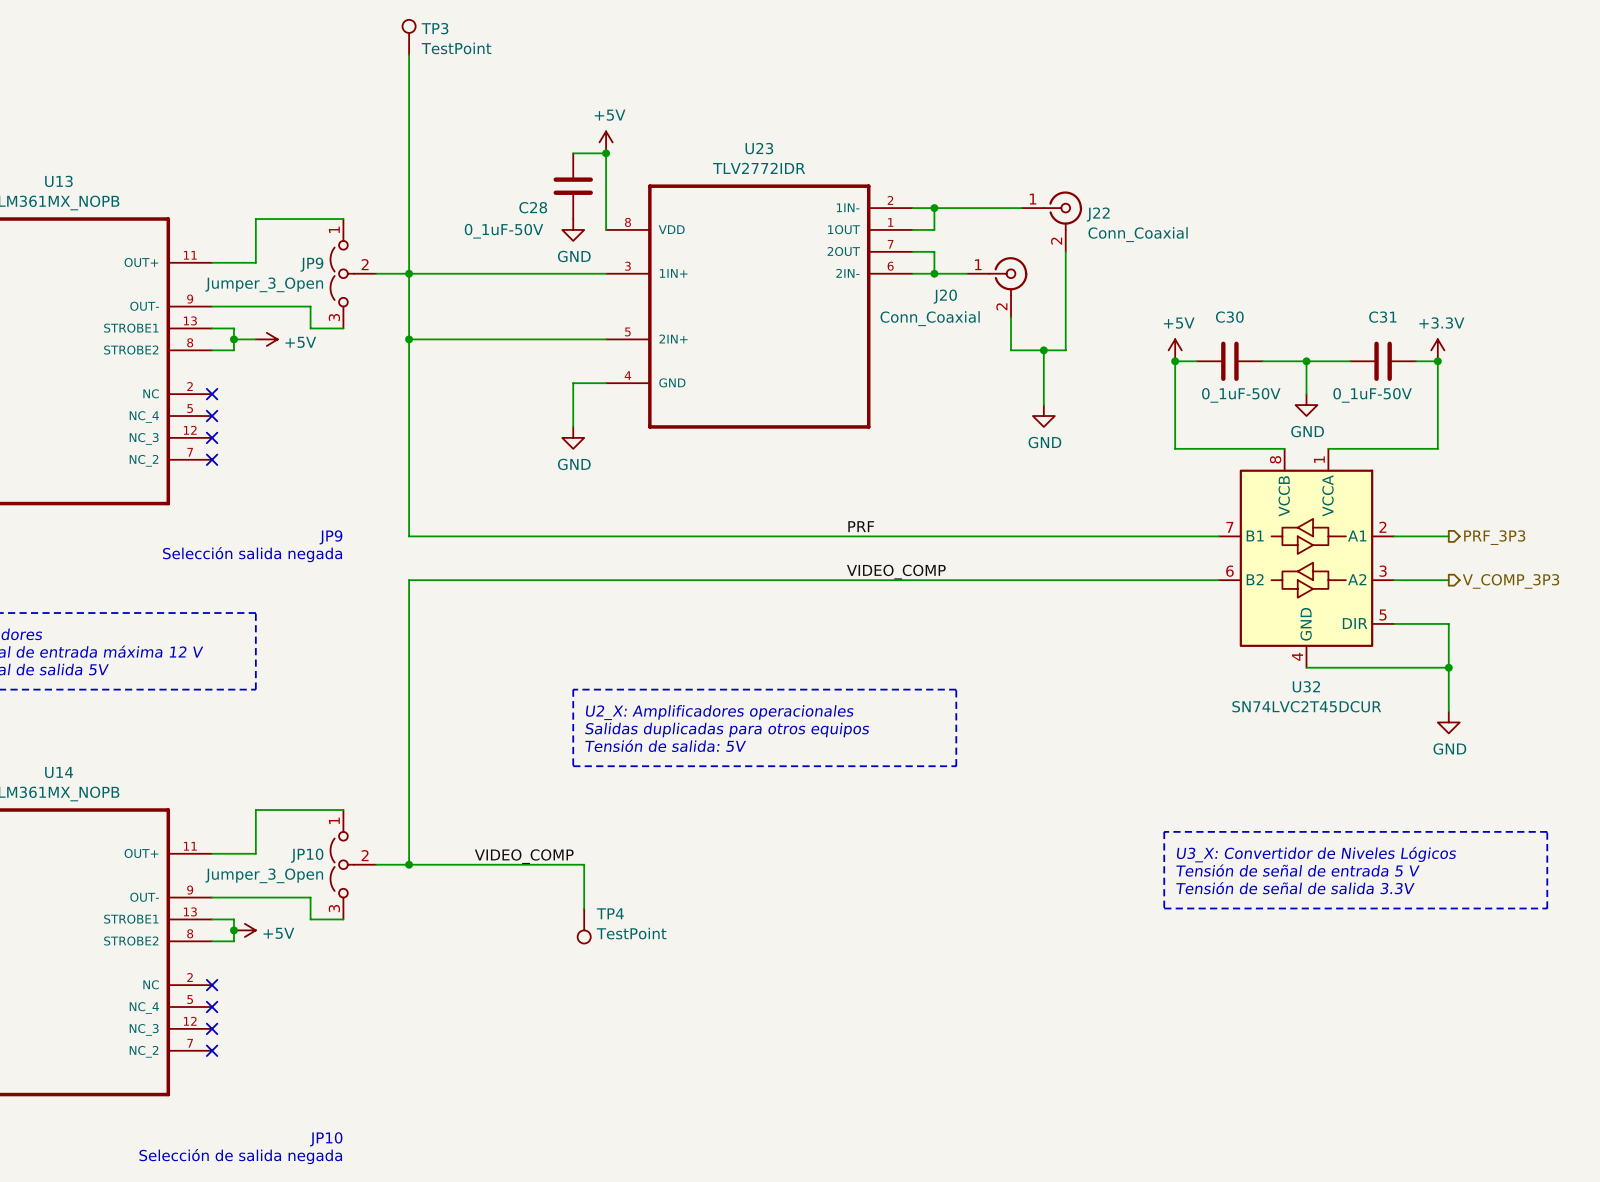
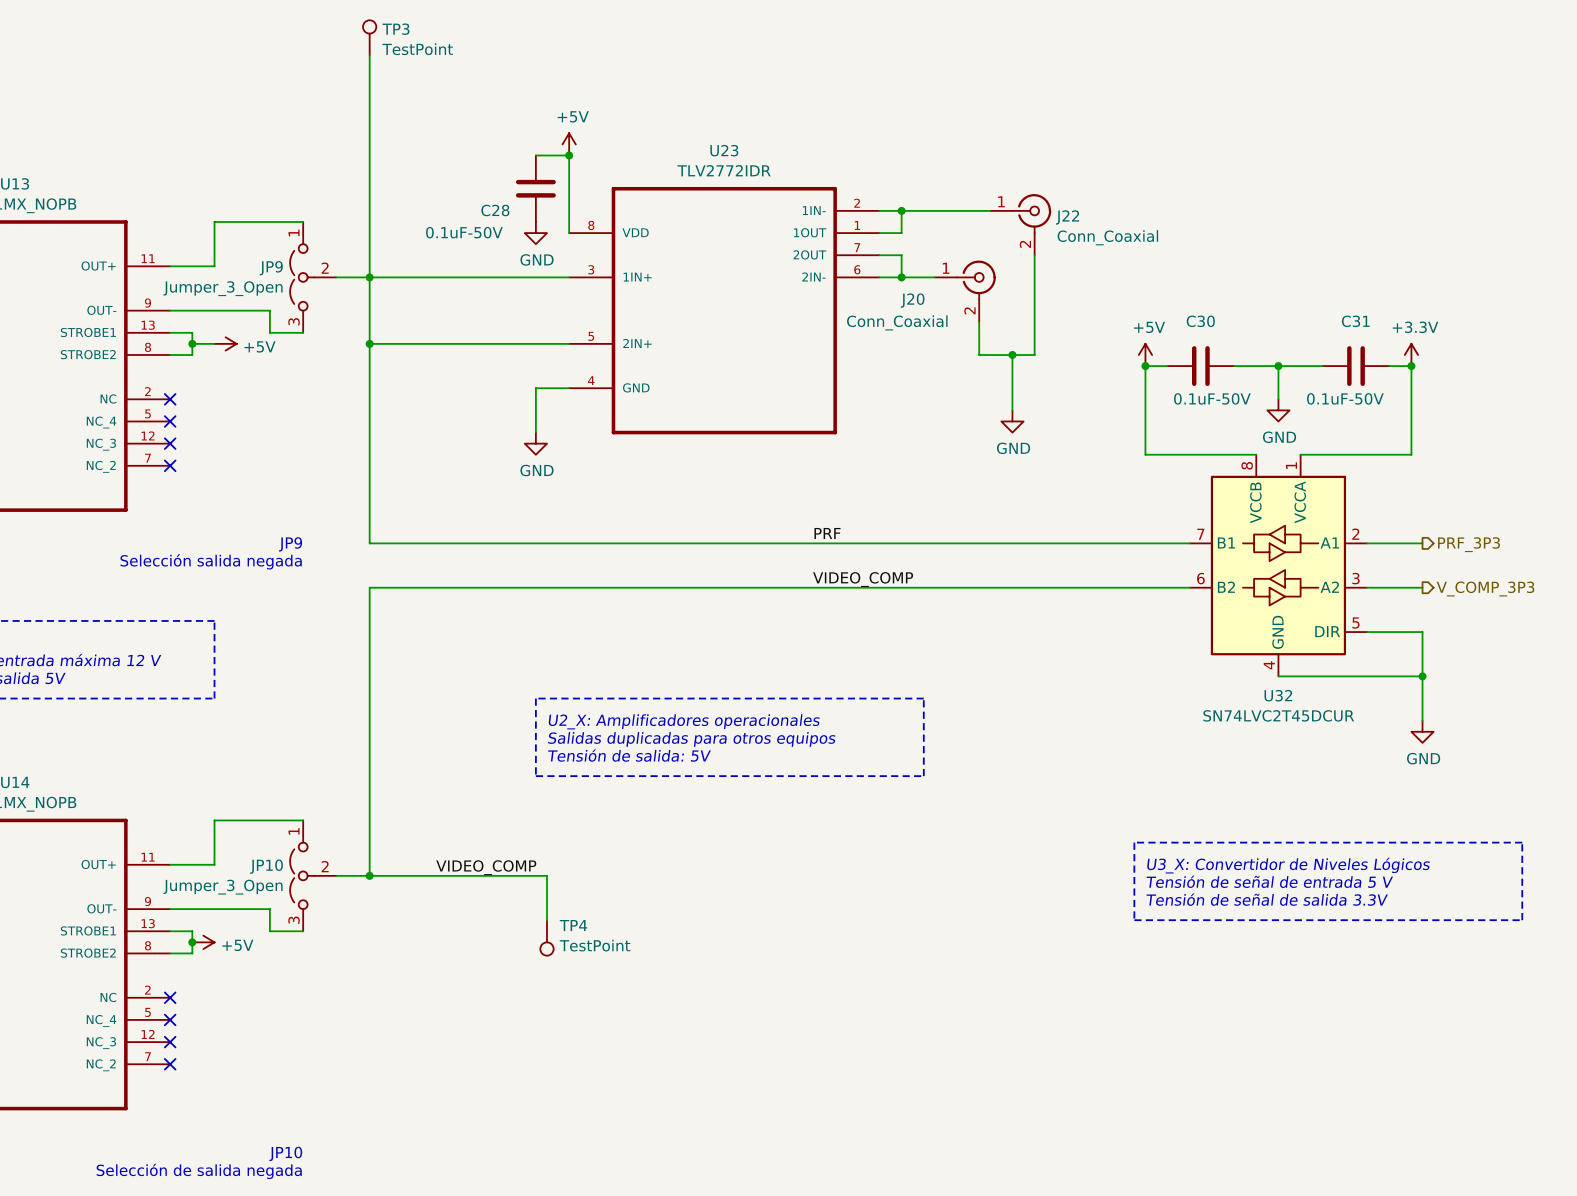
C28 value: 0_1uF-50V (504, 231) -> 0.1uF-50V (464, 232)
C30 value: 0_1uF-50V (1241, 395) -> 0.1uF-50V (1212, 398)
C31 value: 0_1uF-50V (1372, 395) -> 0.1uF-50V (1345, 398)

